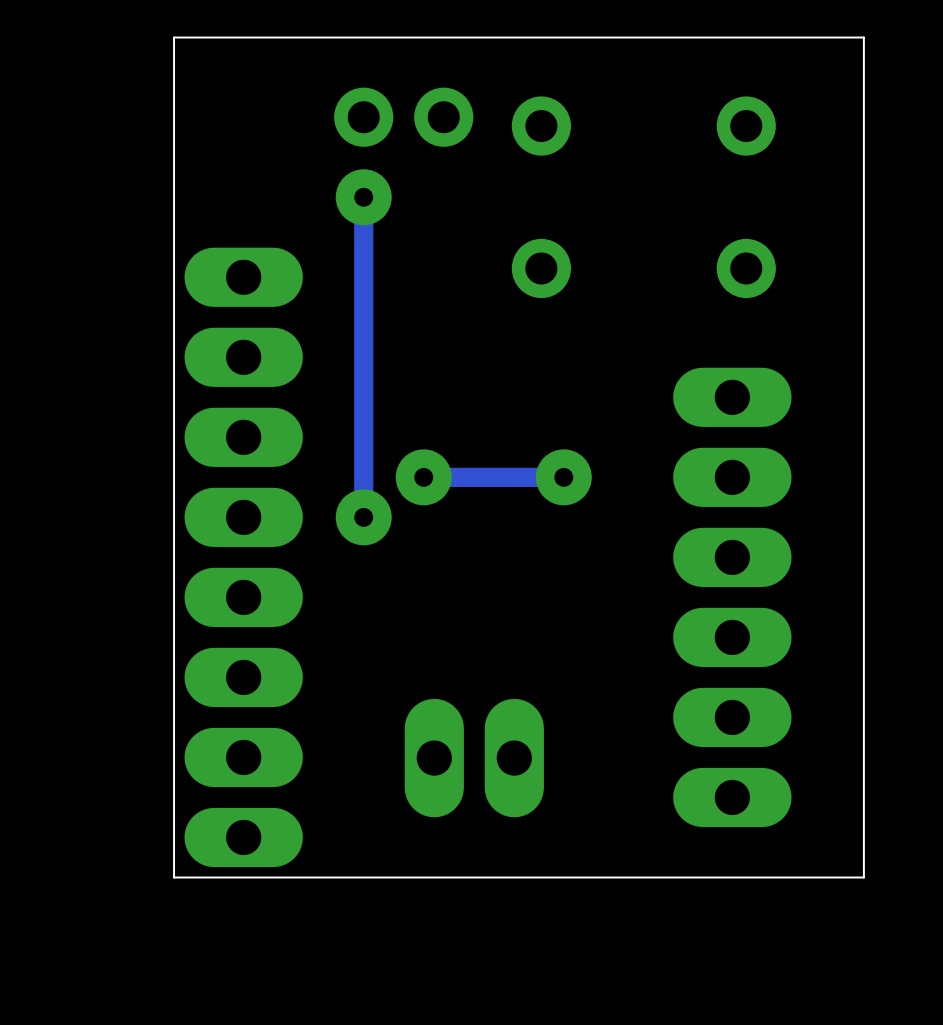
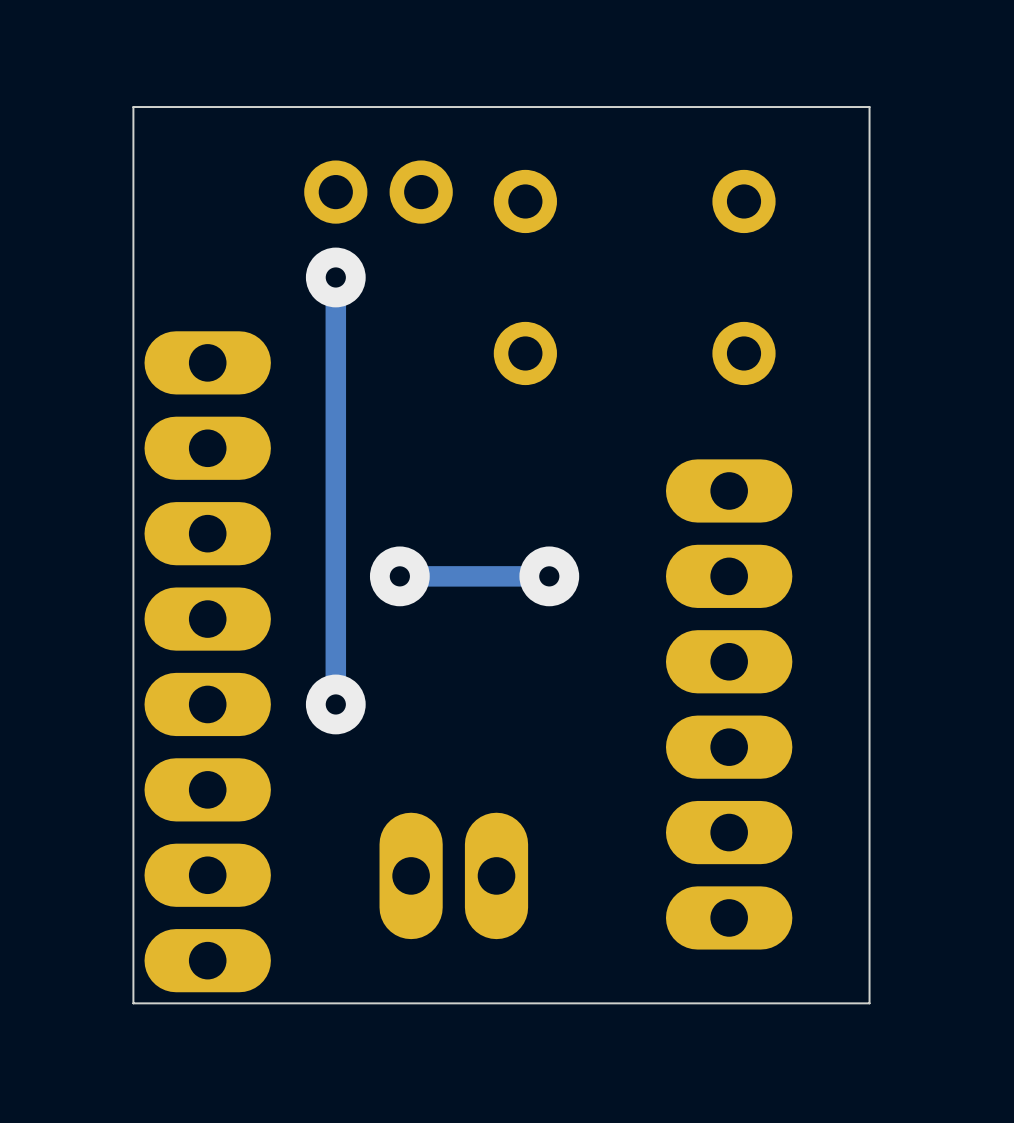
track: none -> (335, 619) (335, 704)
via position: (363, 517) -> (335, 704)

